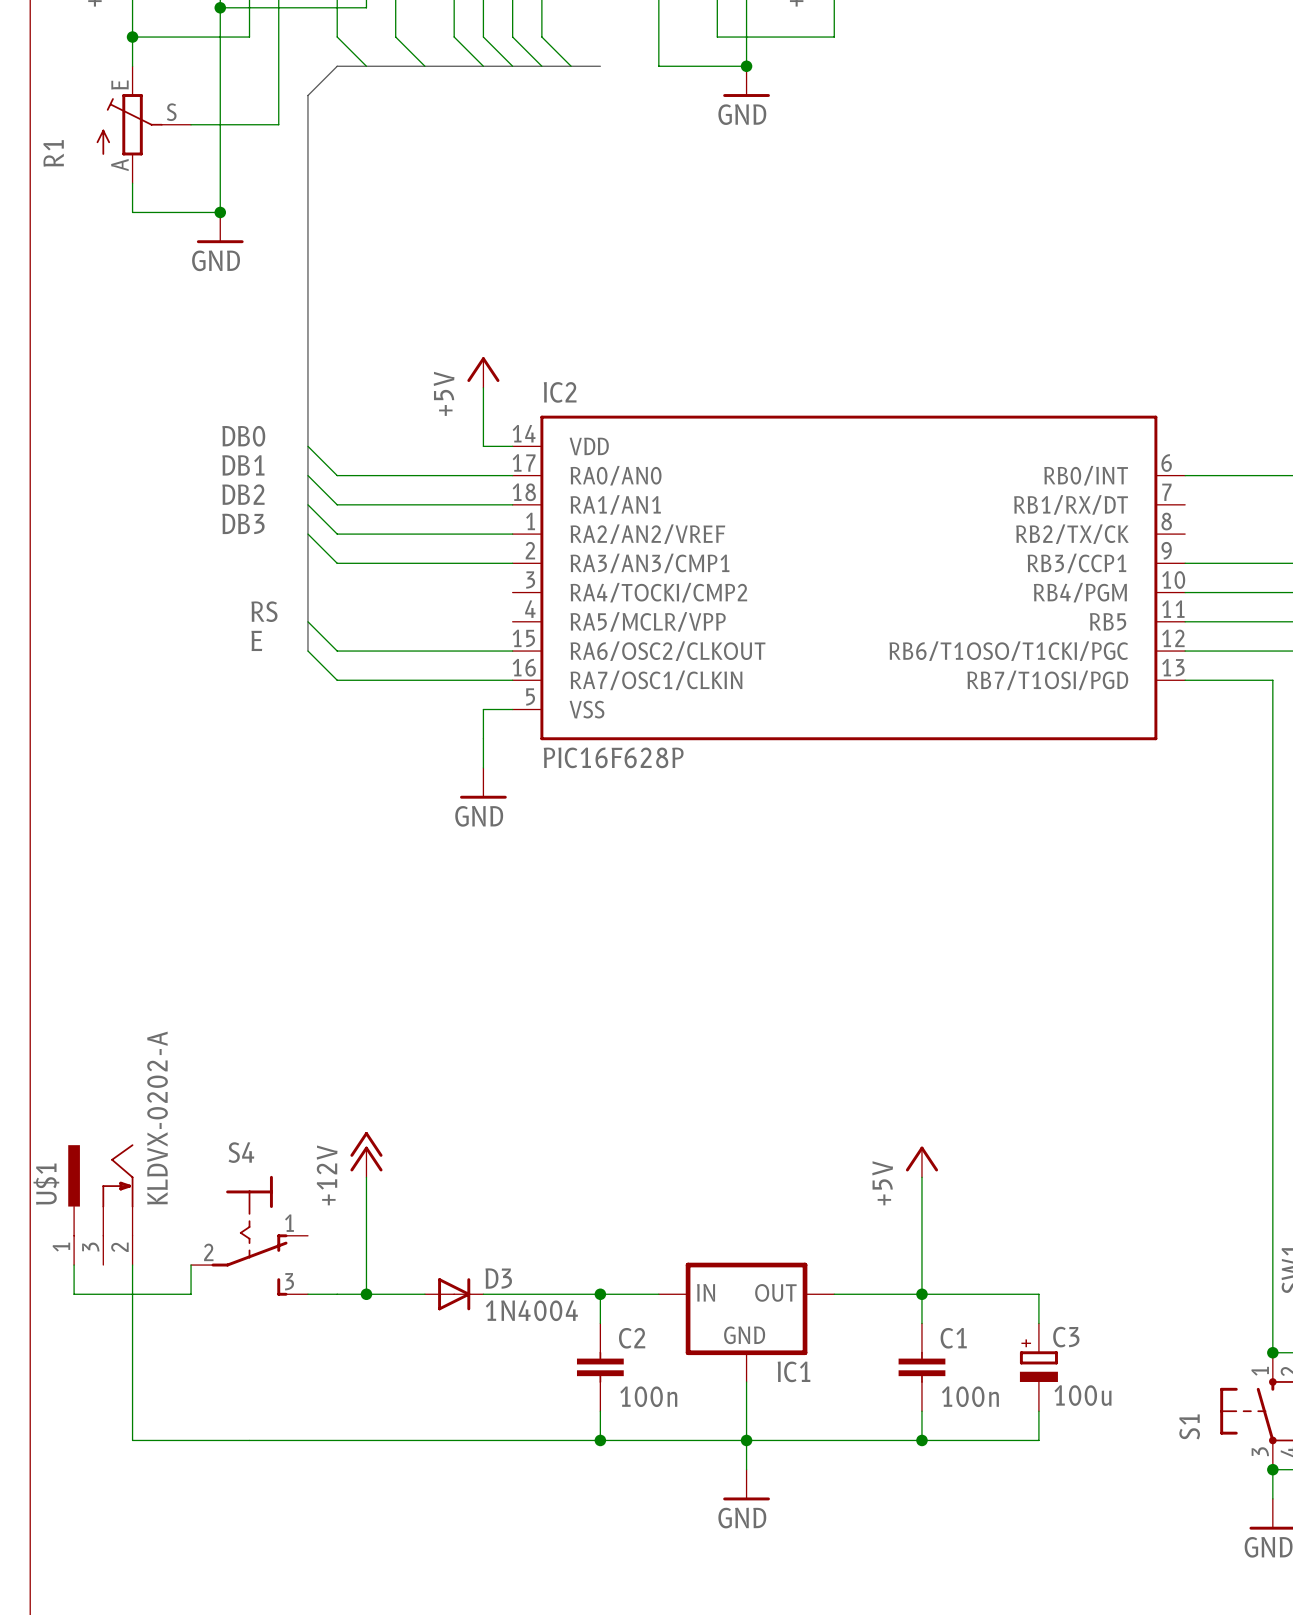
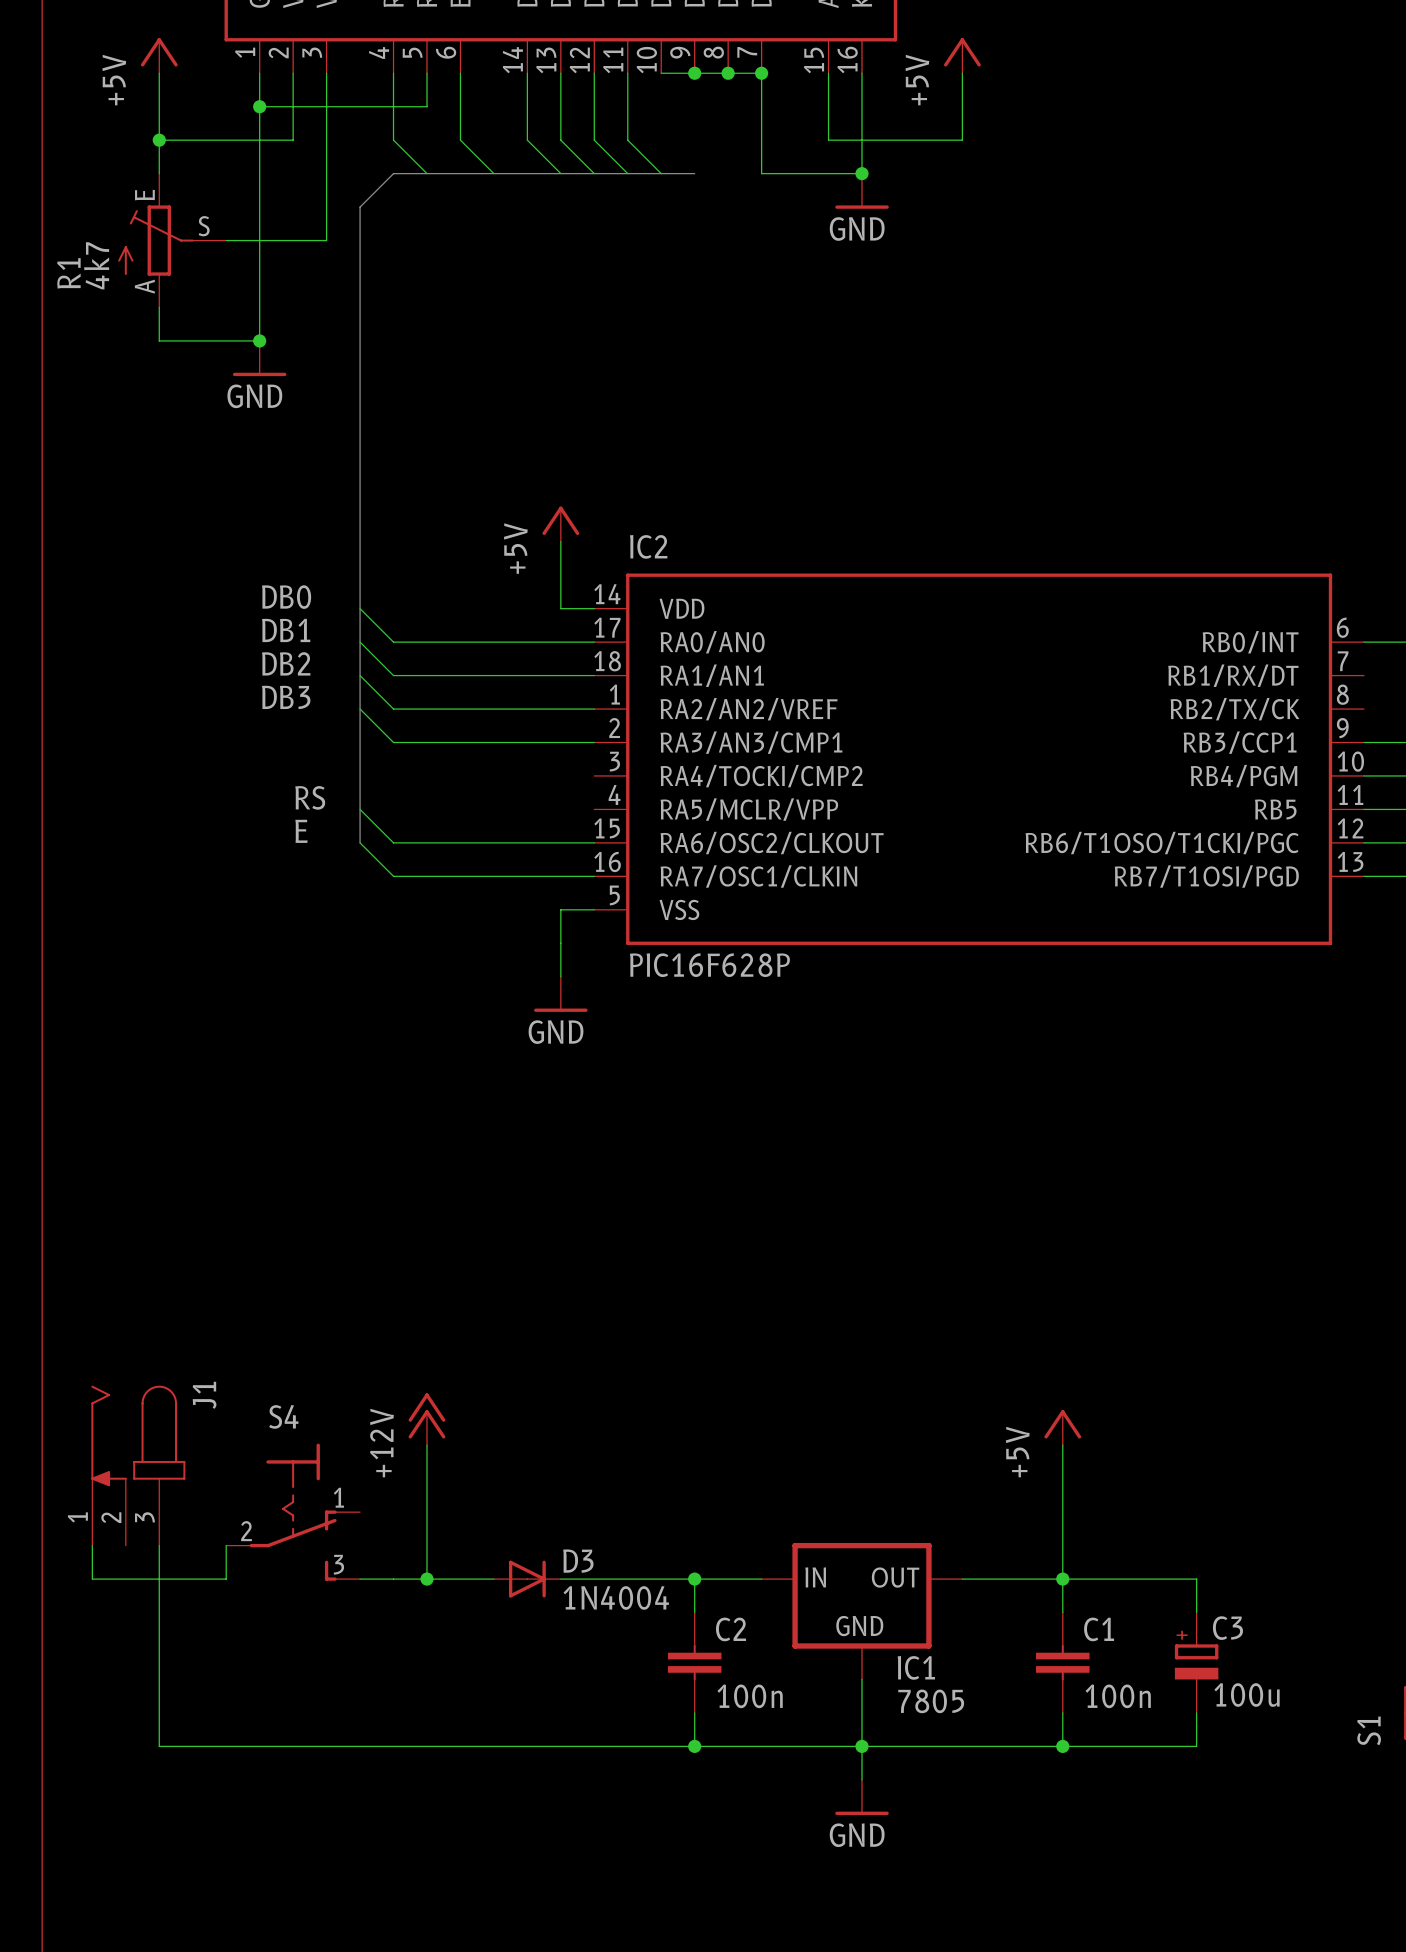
R1 value: none -> 4k7 (96, 265)
J1: none -> (138, 1465)
U$1: KLDVX-0202-A (100, 1204) -> none
IC1 value: none -> 7805 (931, 1701)

